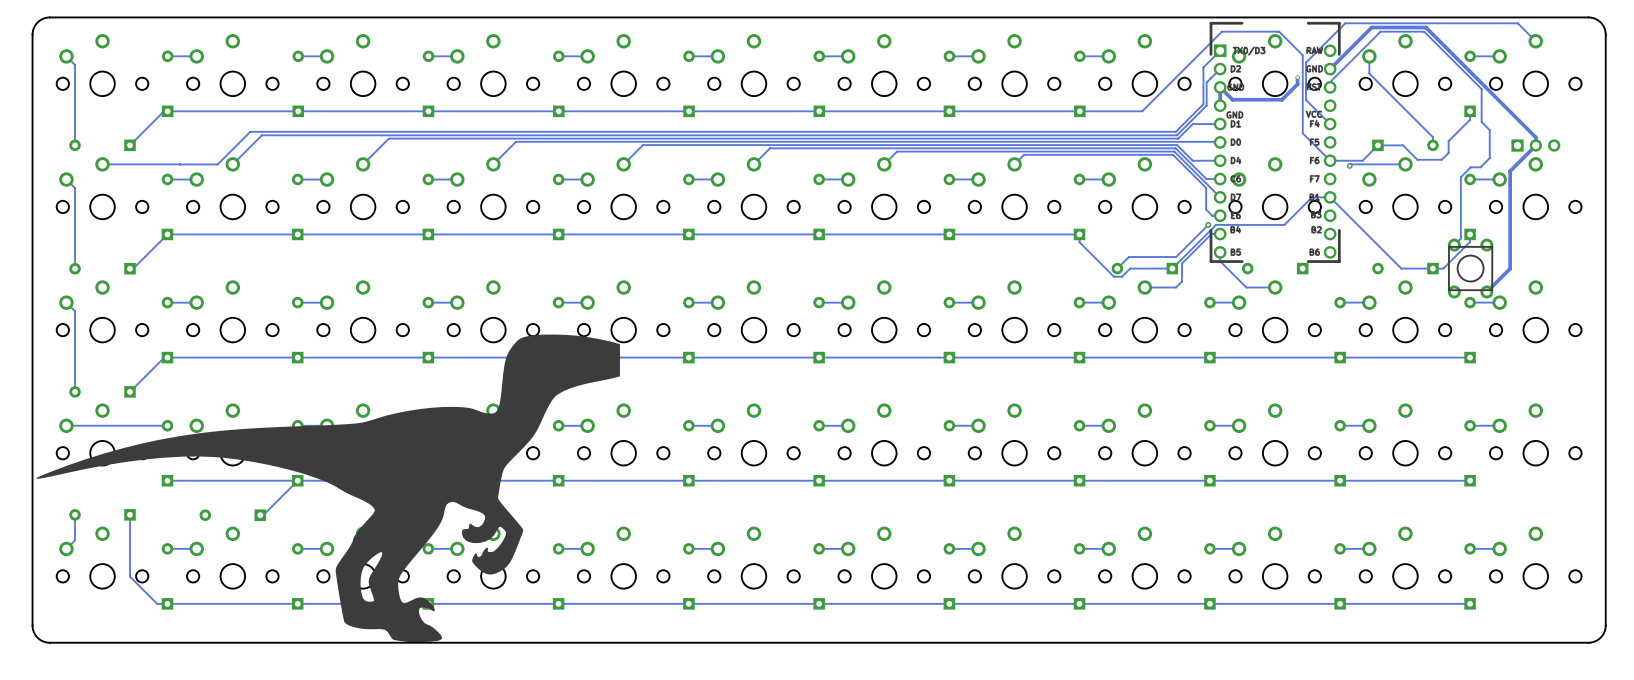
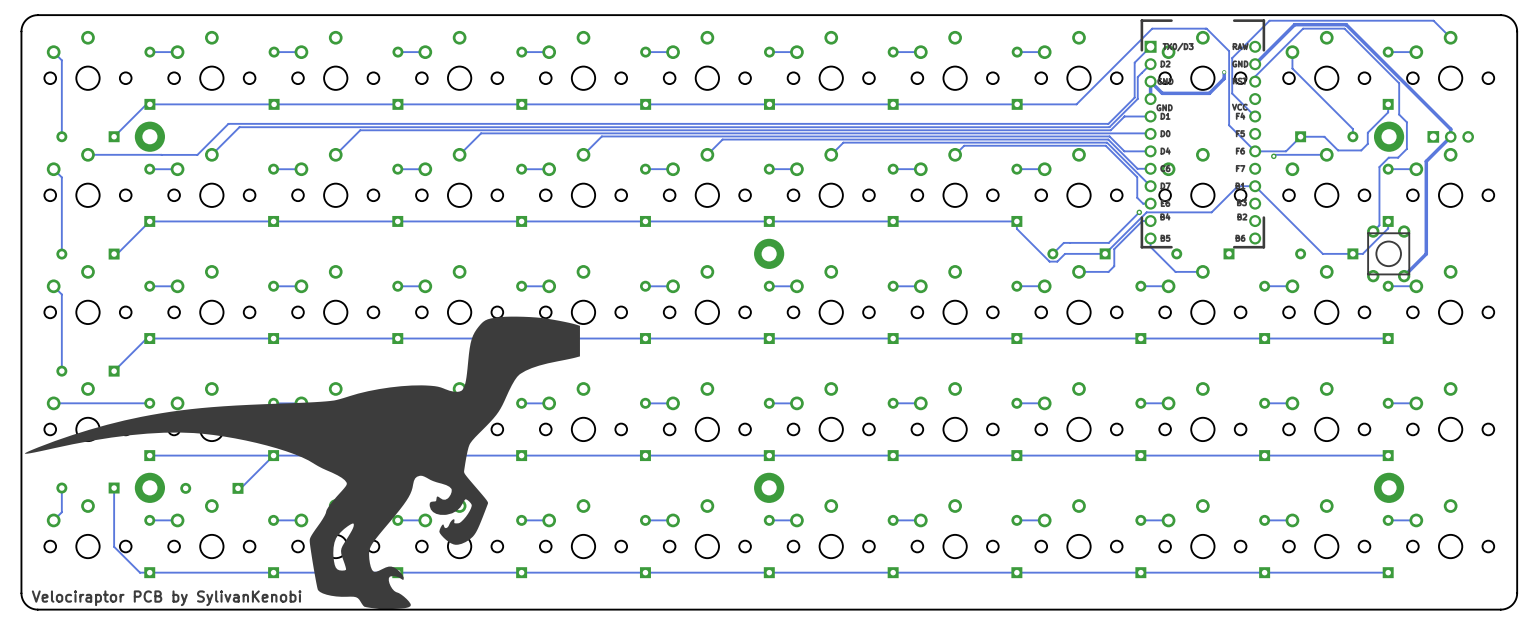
part: none -> (149, 136)
part: none -> (1389, 136)
part: none -> (769, 253)
part: none -> (149, 487)
part: none -> (769, 487)
part: none -> (1389, 487)
text: none -> Velociraptor PCB by SylivanKenobi (166, 598)

